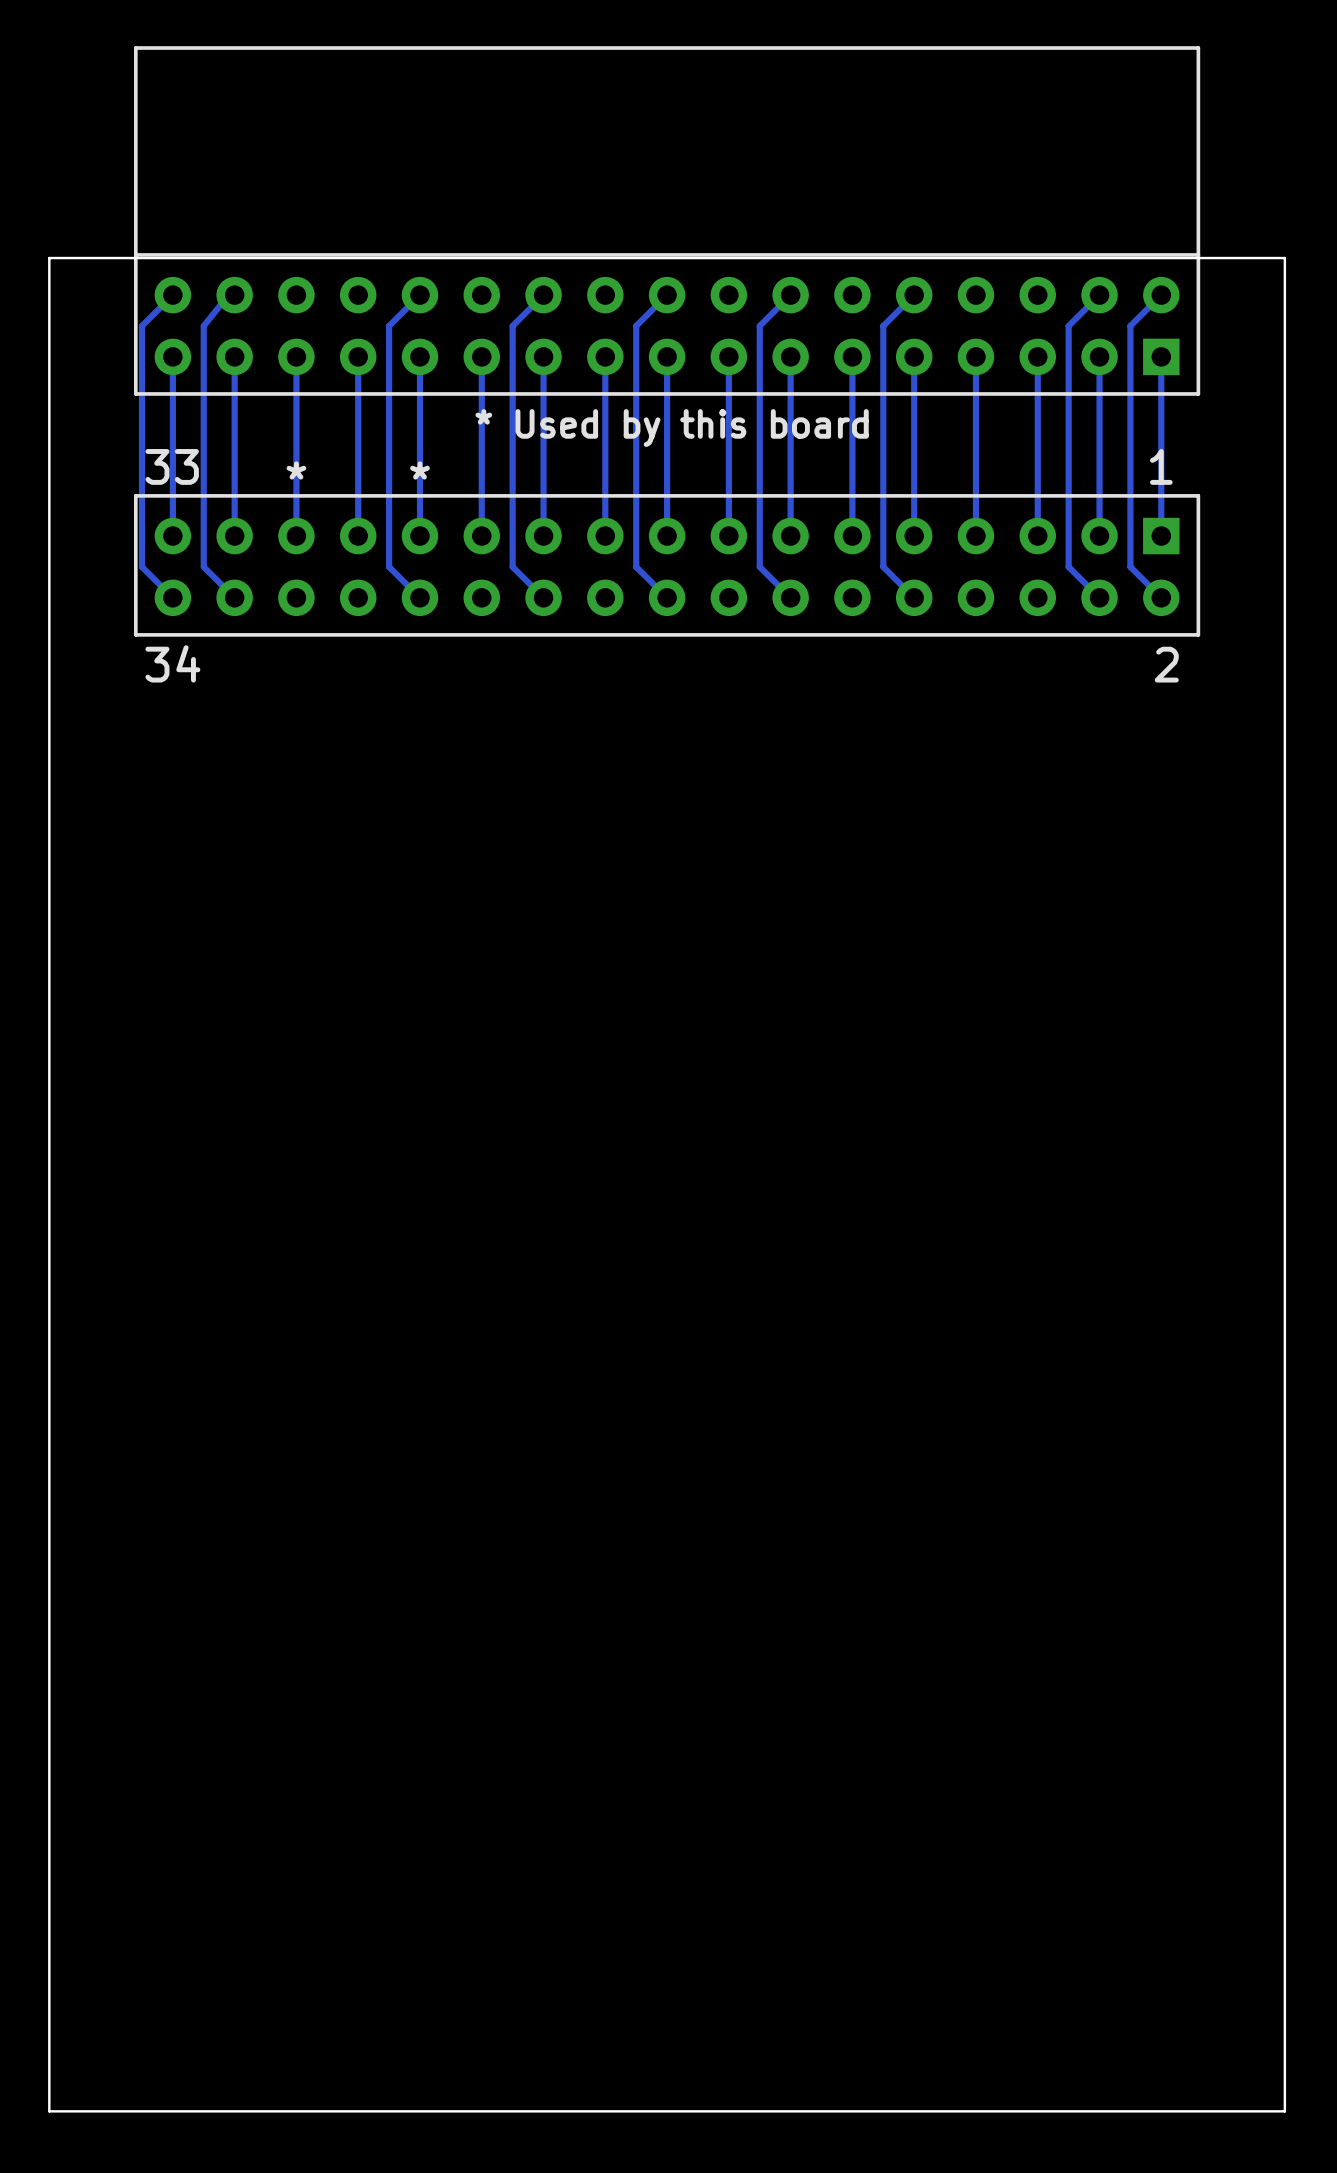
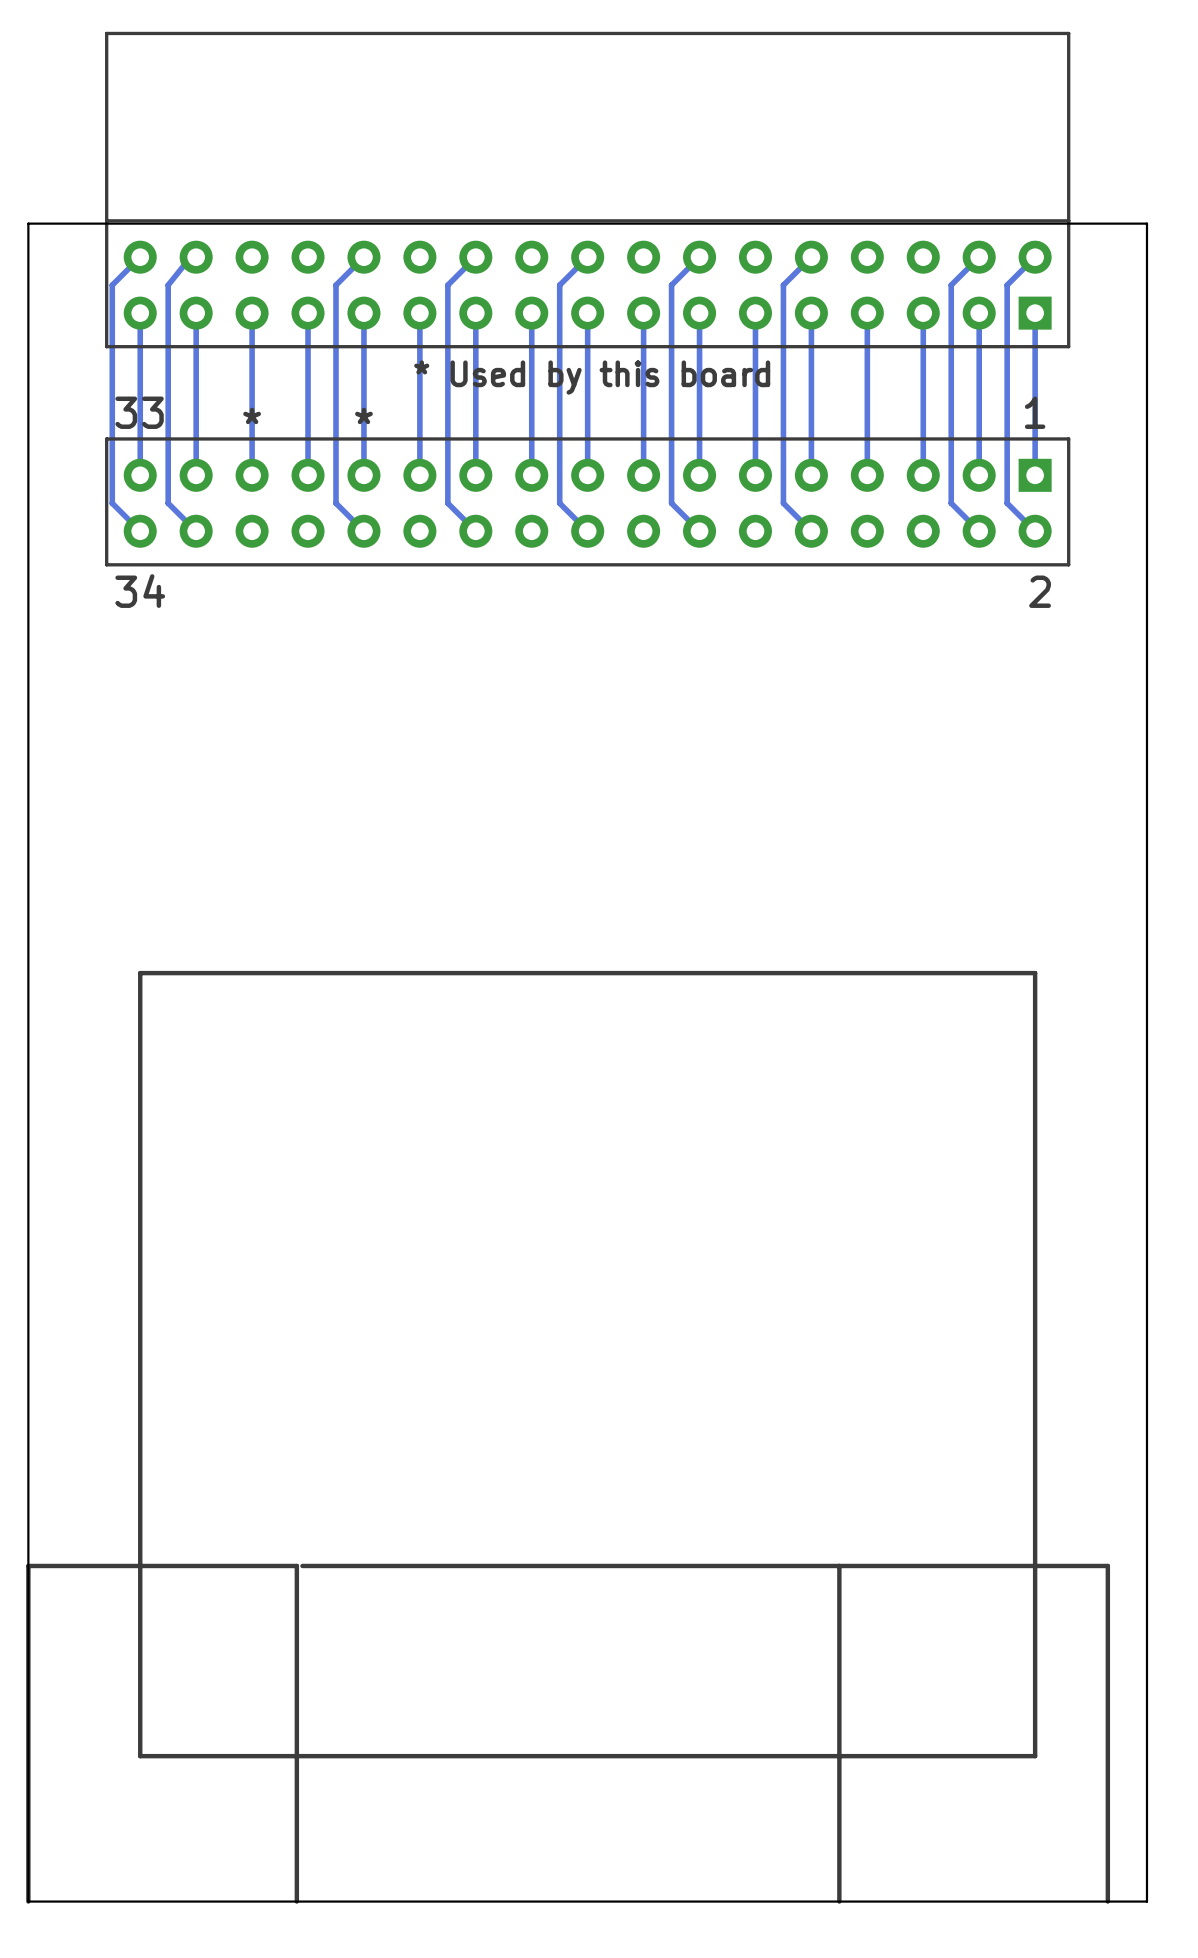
line: none -> (140, 973) (140, 1756) (1035, 1756) (1035, 973) (140, 973)
line: none -> (302, 1565) (1107, 1565) (1107, 1901)
line: none -> (839, 1565) (839, 1901)
line: none -> (28, 1901) (28, 1565) (296, 1565) (296, 1901)

